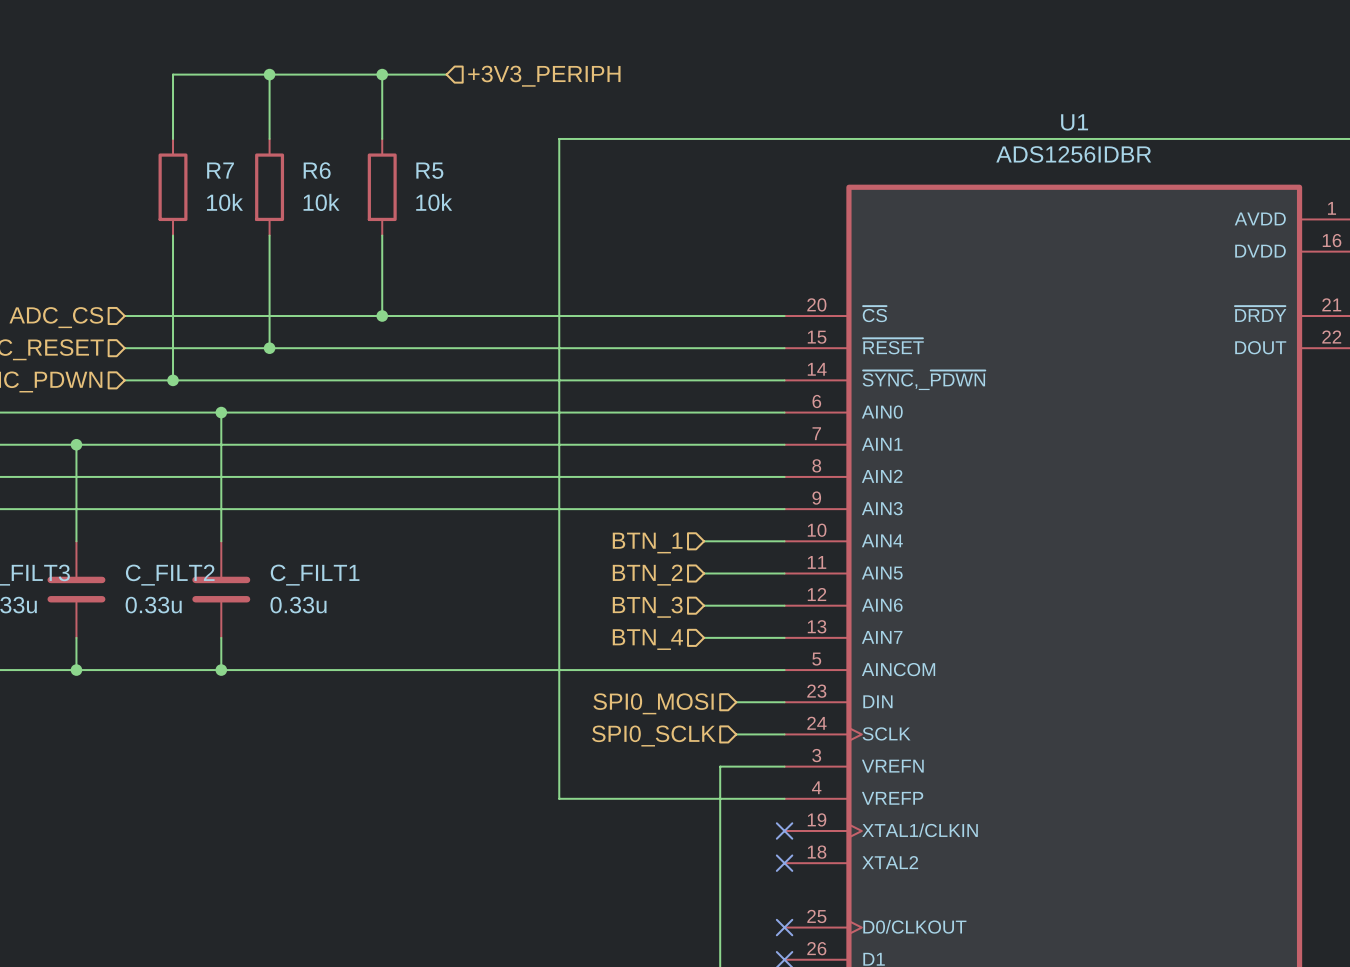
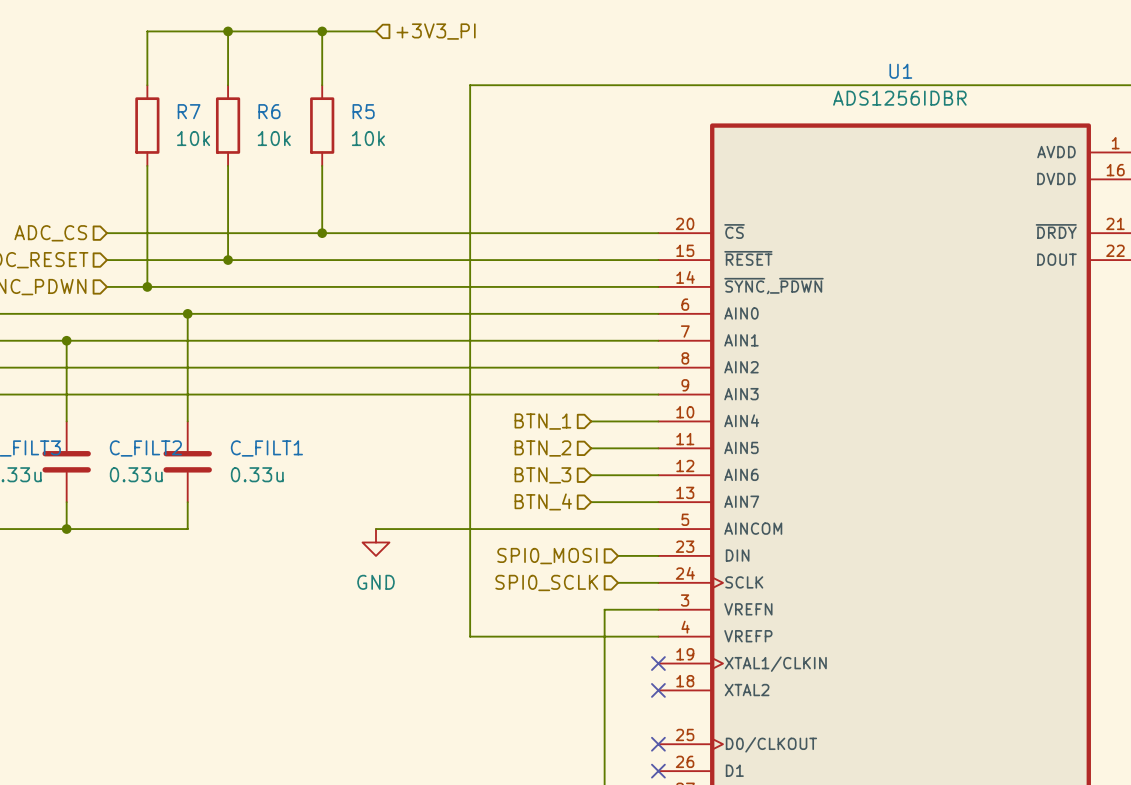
hierarchical label: +3V3_PERIPH (544, 76) -> +3V3_PI (436, 31)
wire: (221, 670) (446, 670) -> none
junction: (221, 670) -> none
power symbol: none -> GND (375, 542)

